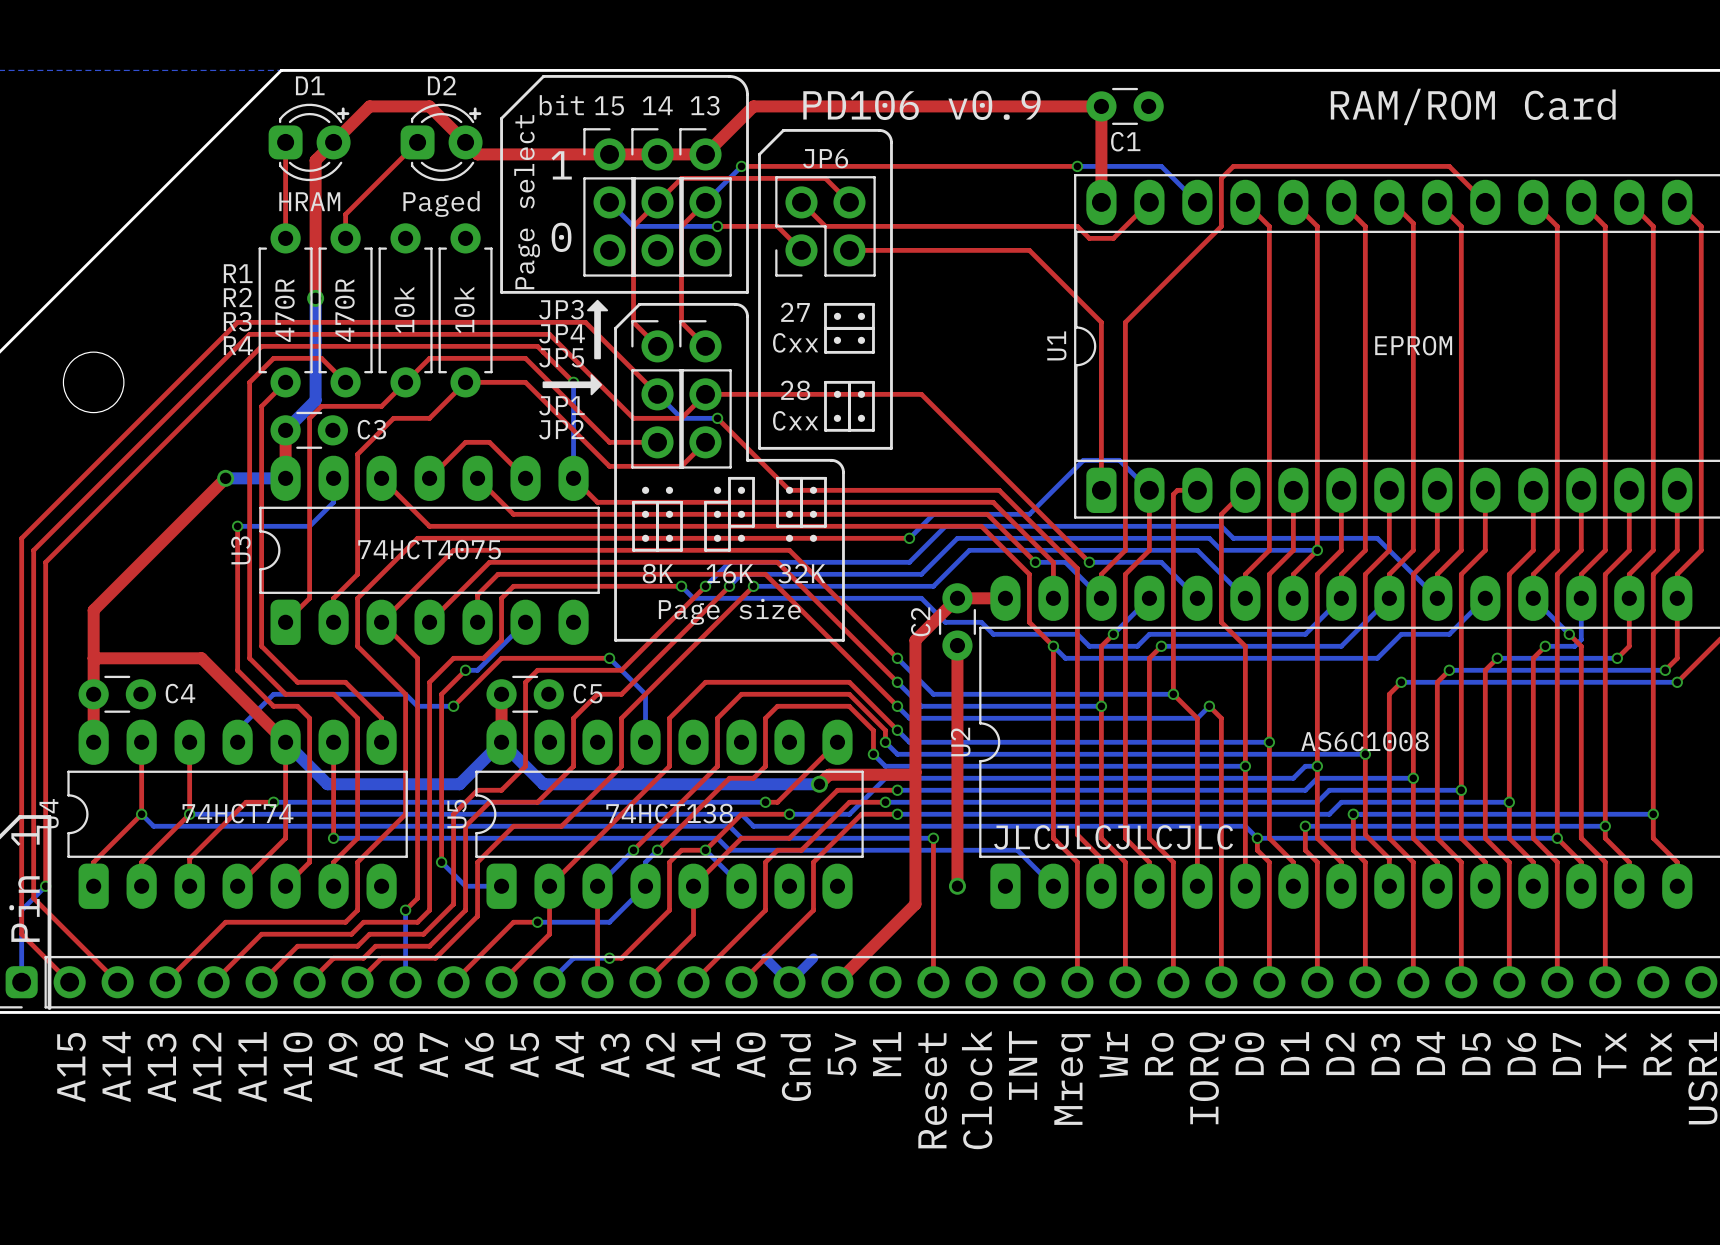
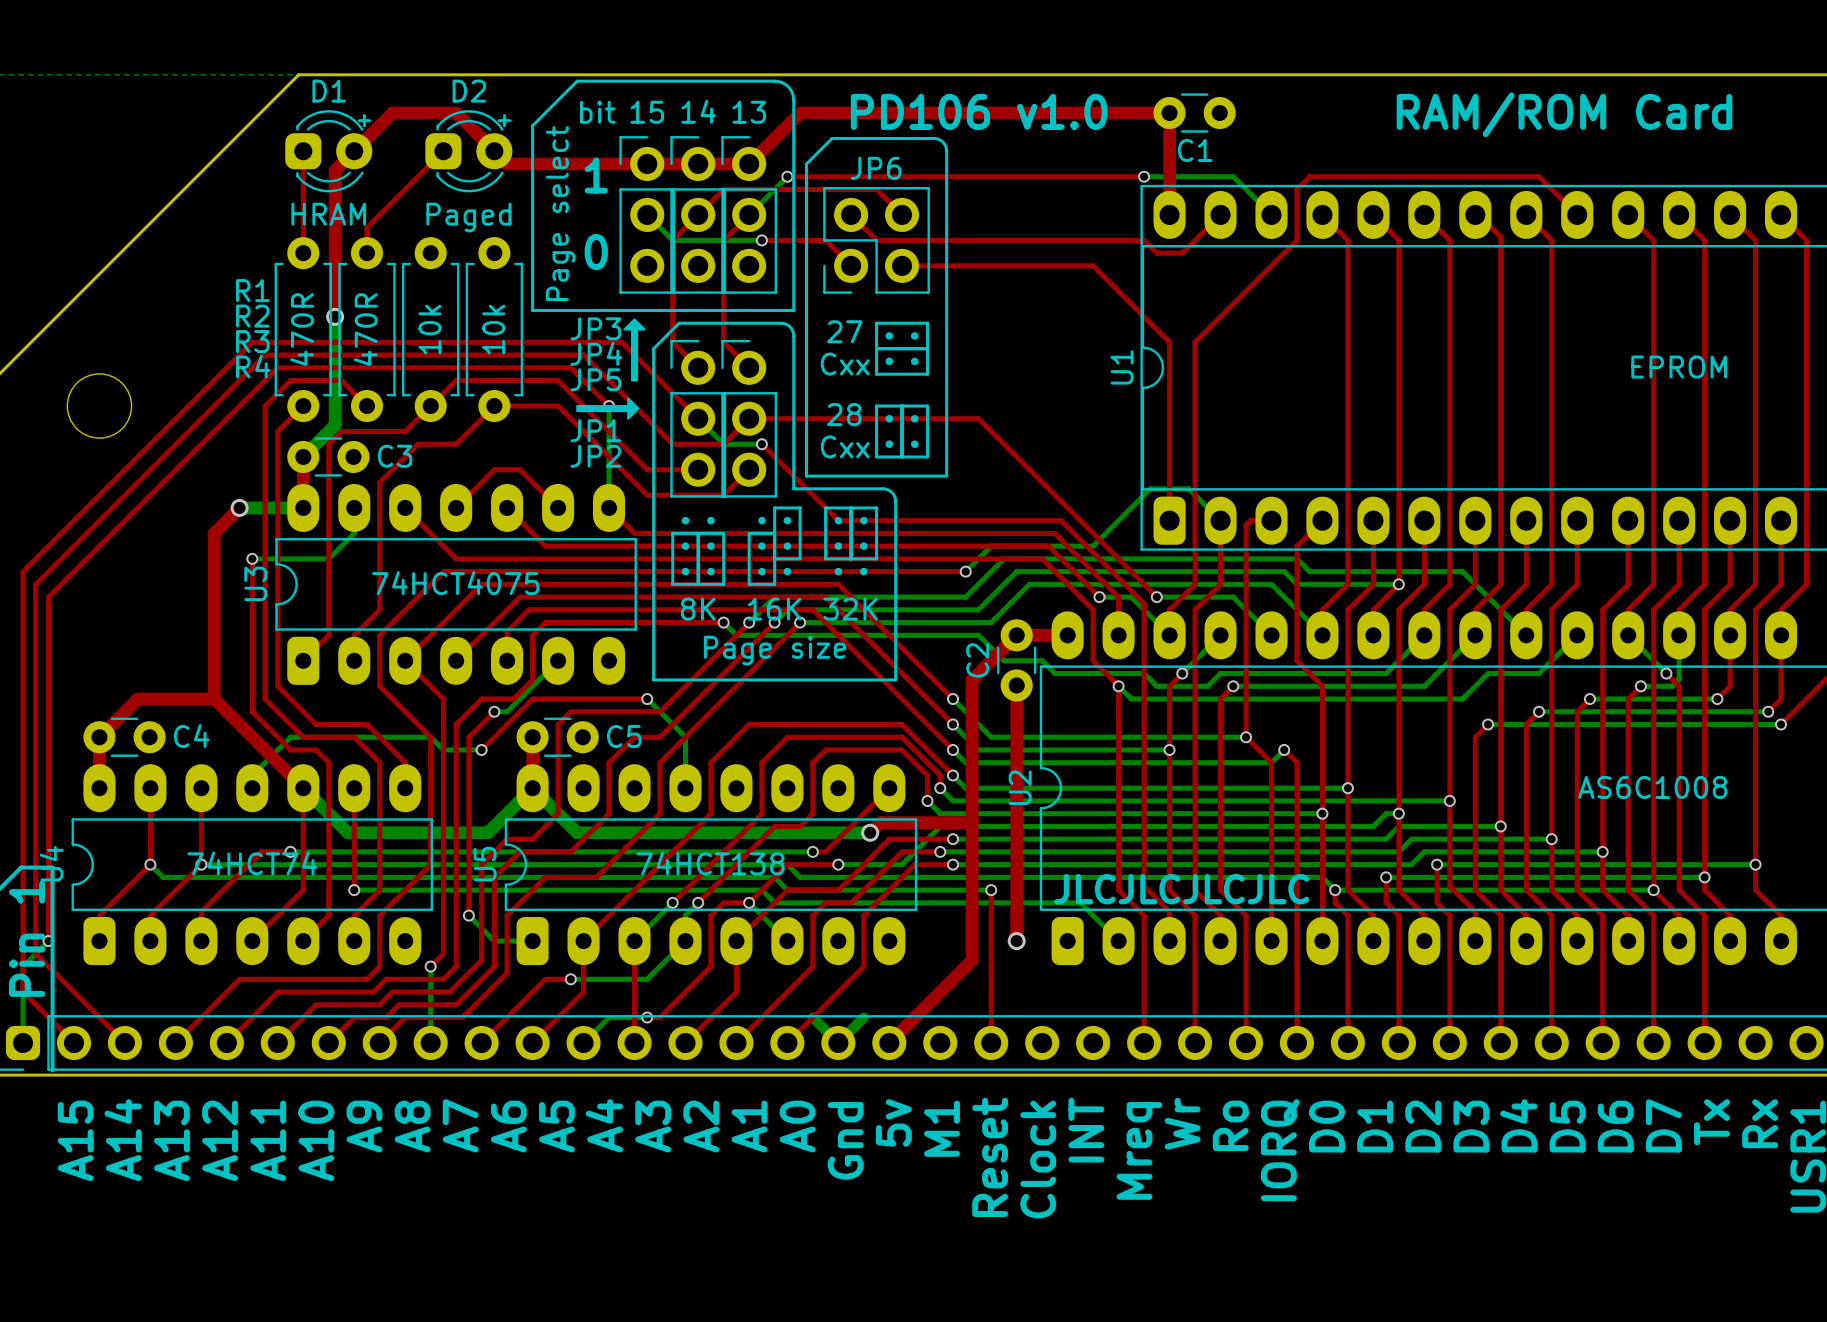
text: PD106 v0.9 (921, 105) -> PD106 v1.0 (979, 111)
U1 value position: EPROM (1413, 345) -> EPROM (1679, 367)
top track: (201, 502) (93, 610) (93, 694) -> (214, 533) (214, 699)
top track: (93, 658) (129, 658) -> (99, 737) (137, 699)
U2 value position: AS6C1008 (1365, 741) -> AS6C1008 (1652, 787)

